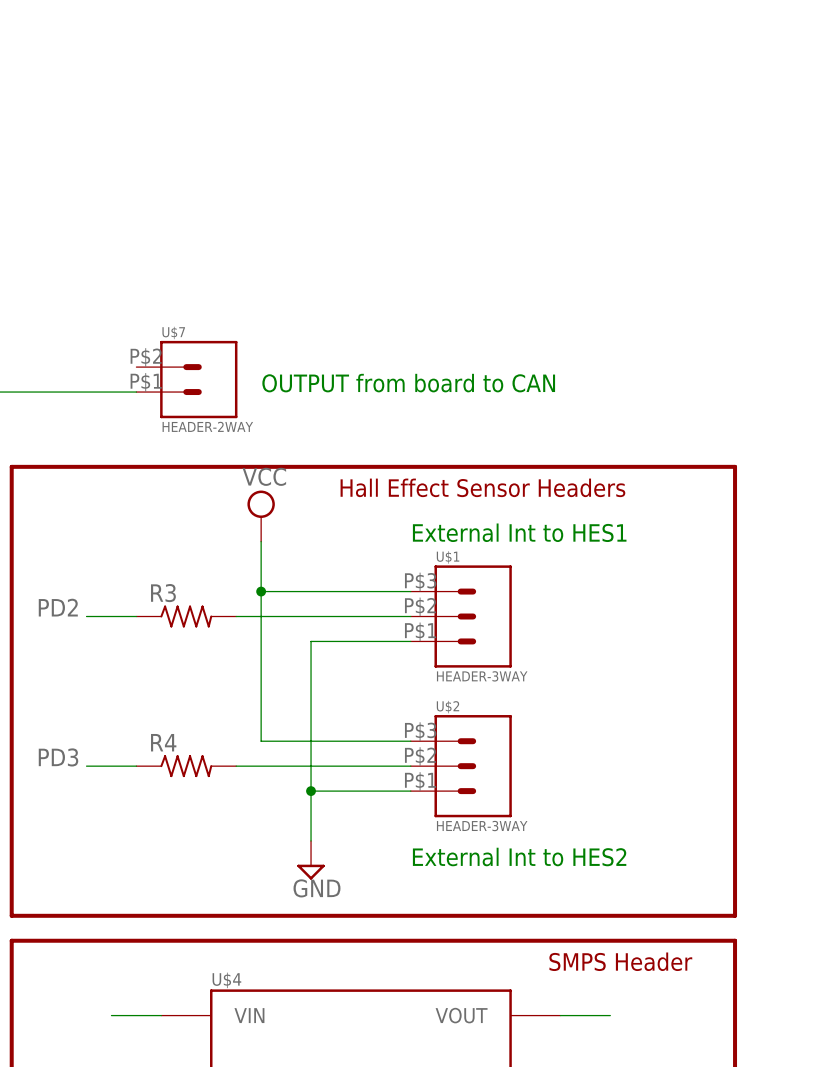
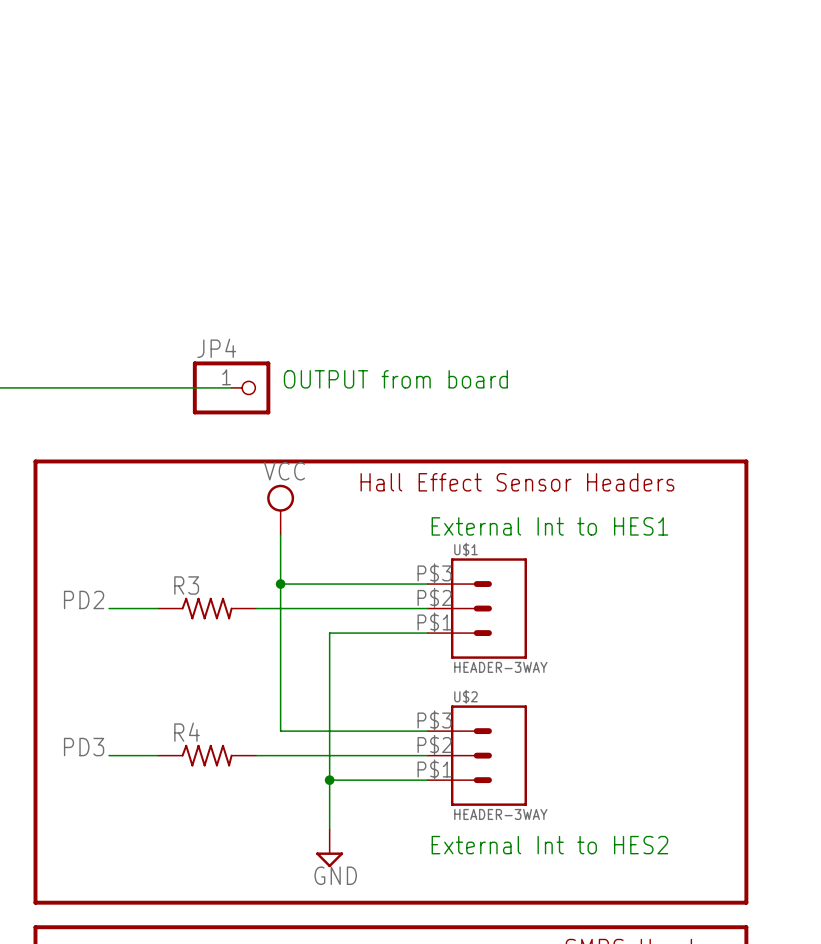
U$7: HEADER-2WAY (186, 379) -> none
text: OUTPUT from board to CAN (408, 383) -> OUTPUT from board (395, 379)
JP4: none -> (231, 387)

